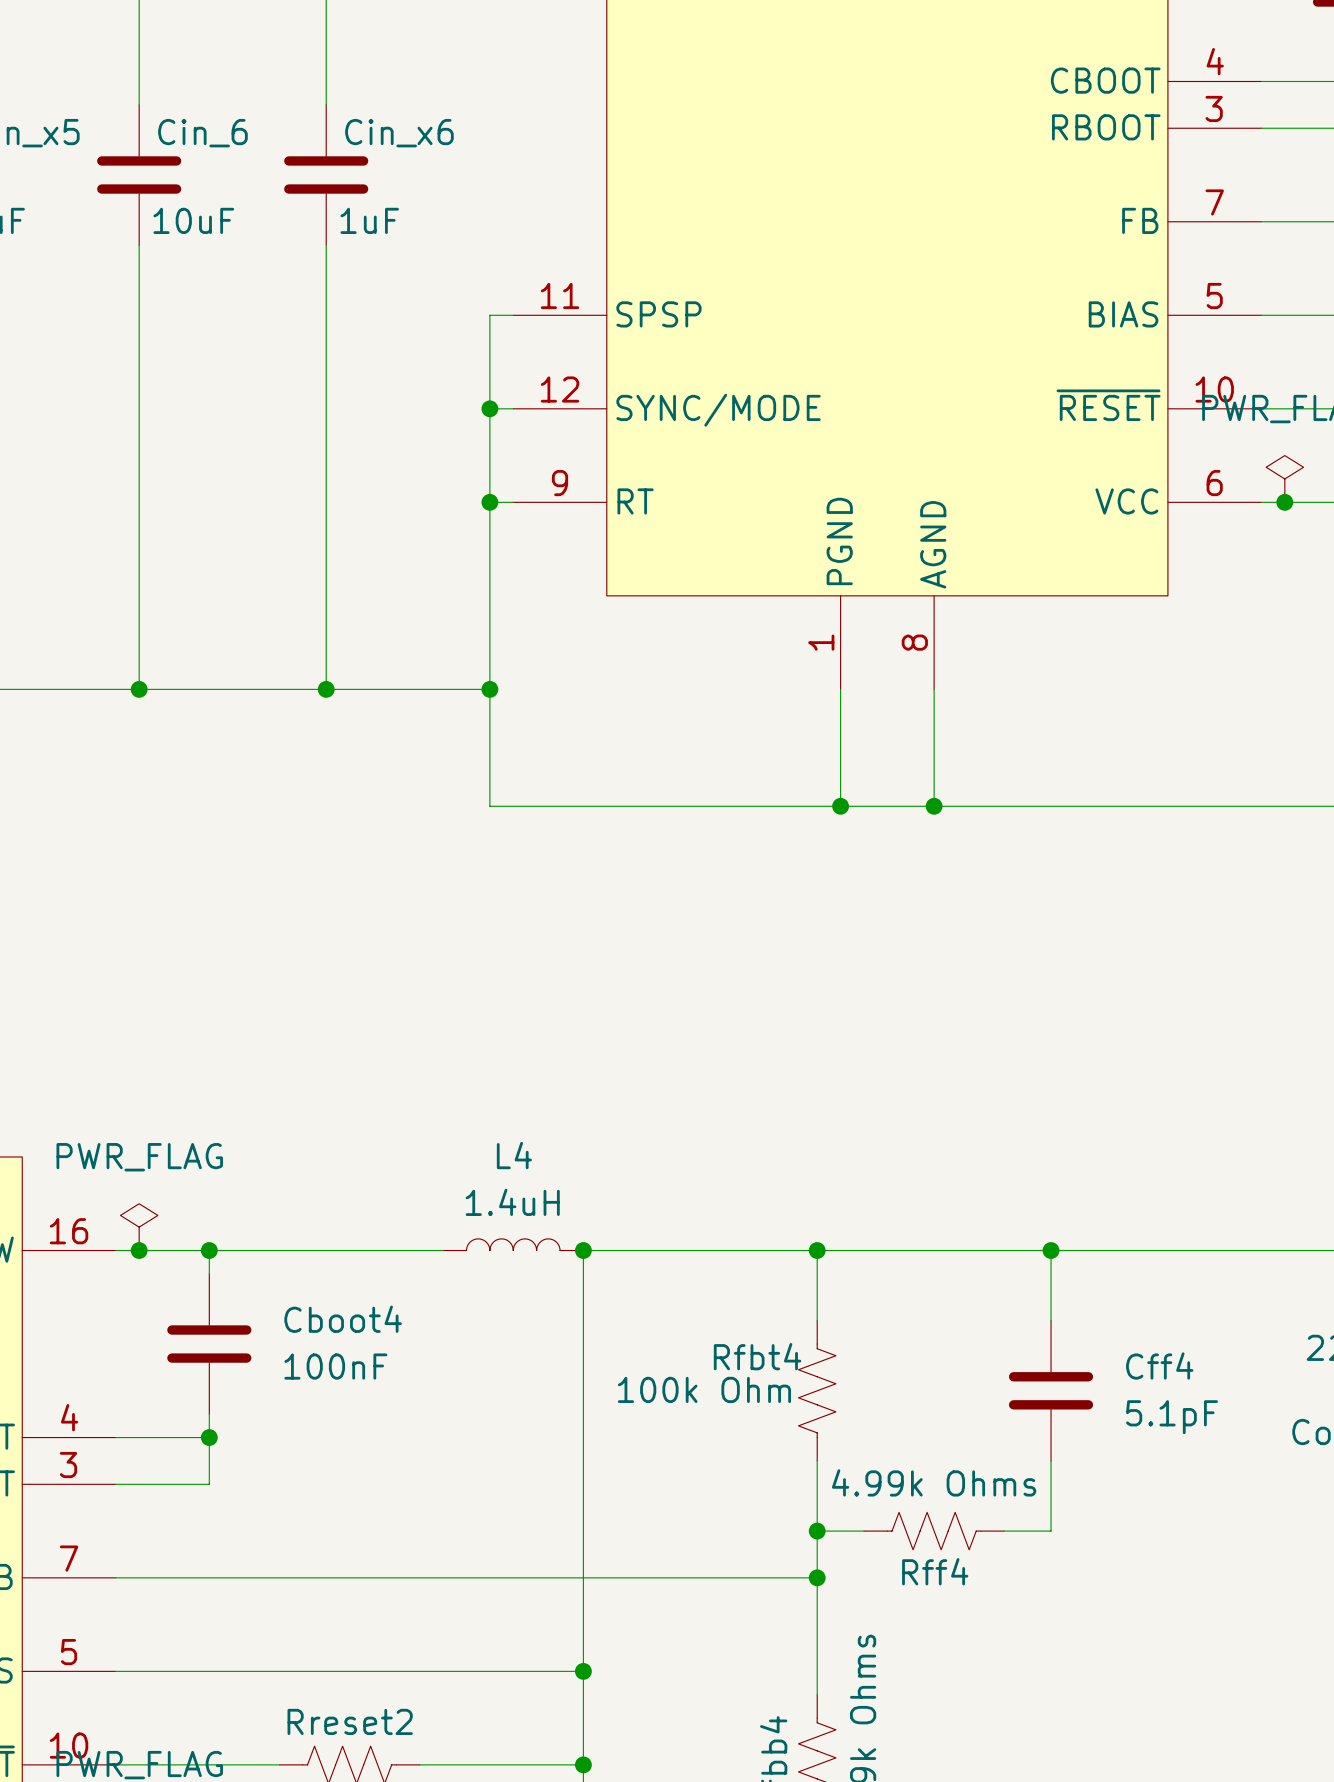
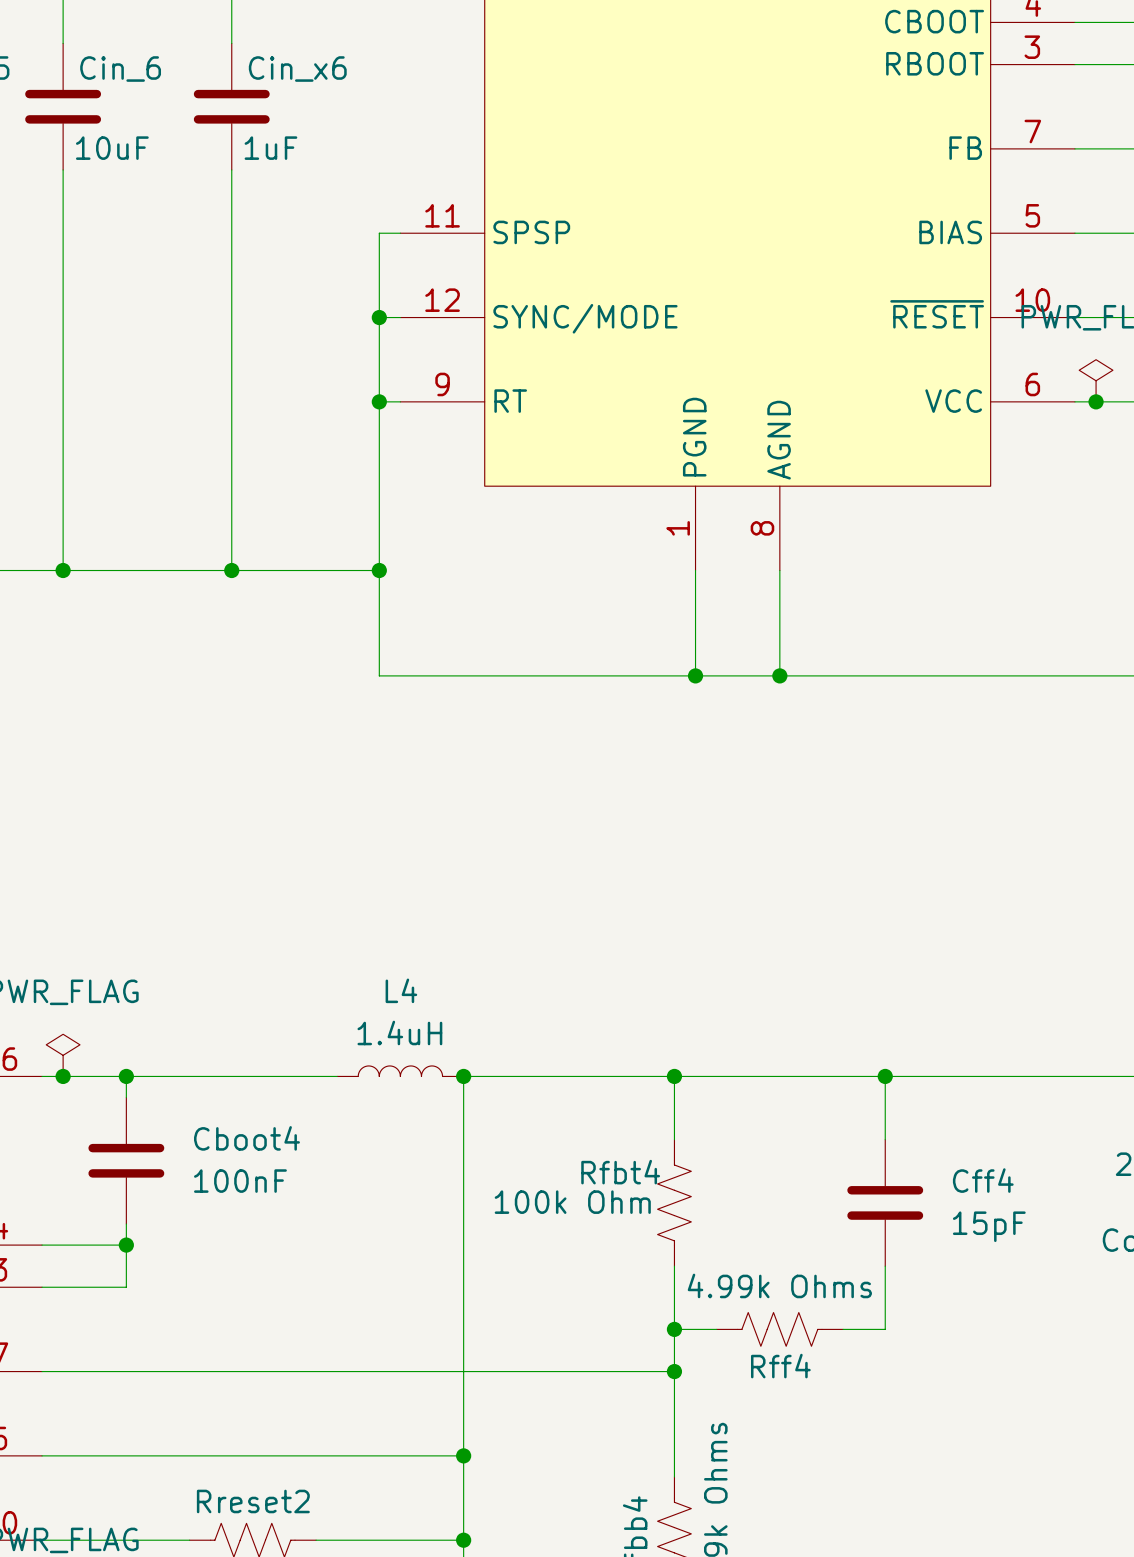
Cff4 value: 5.1pF (1172, 1417) -> 15pF (989, 1226)

